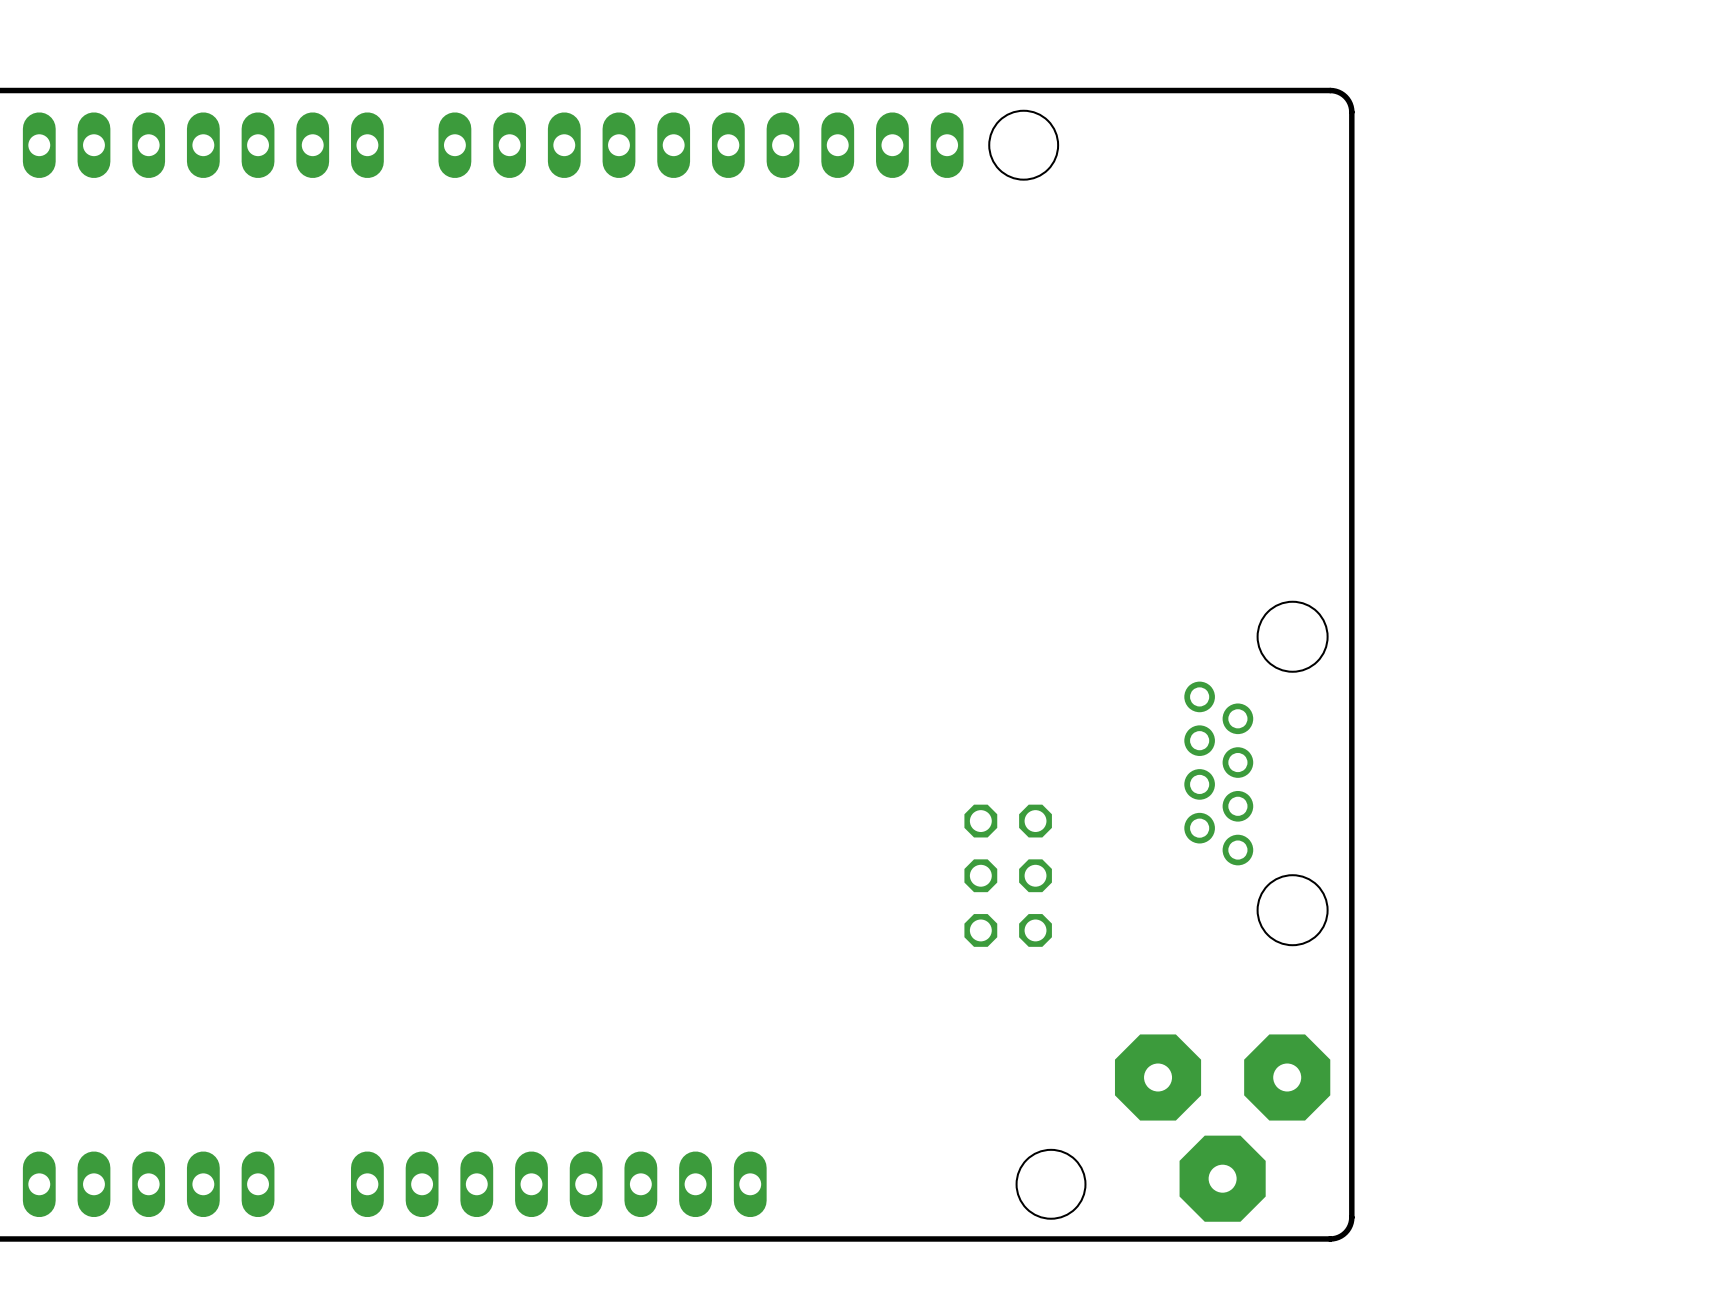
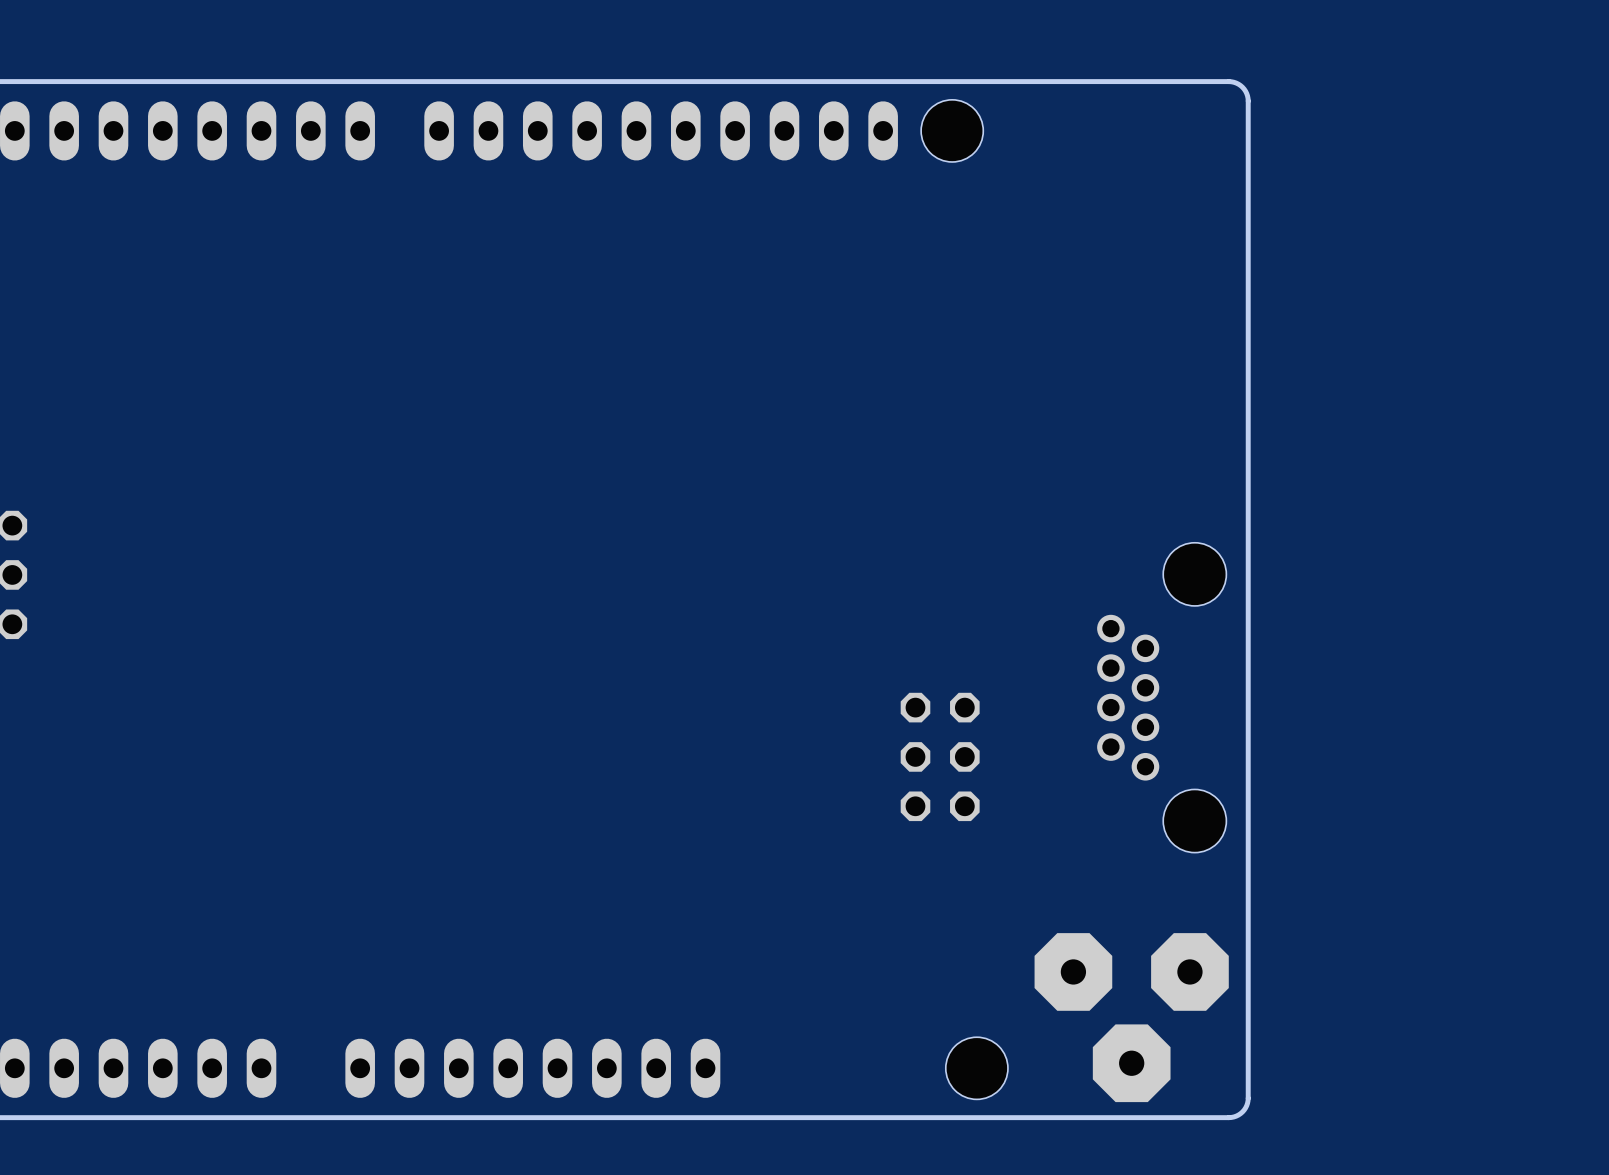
part position: (1008, 875) -> (940, 756)

